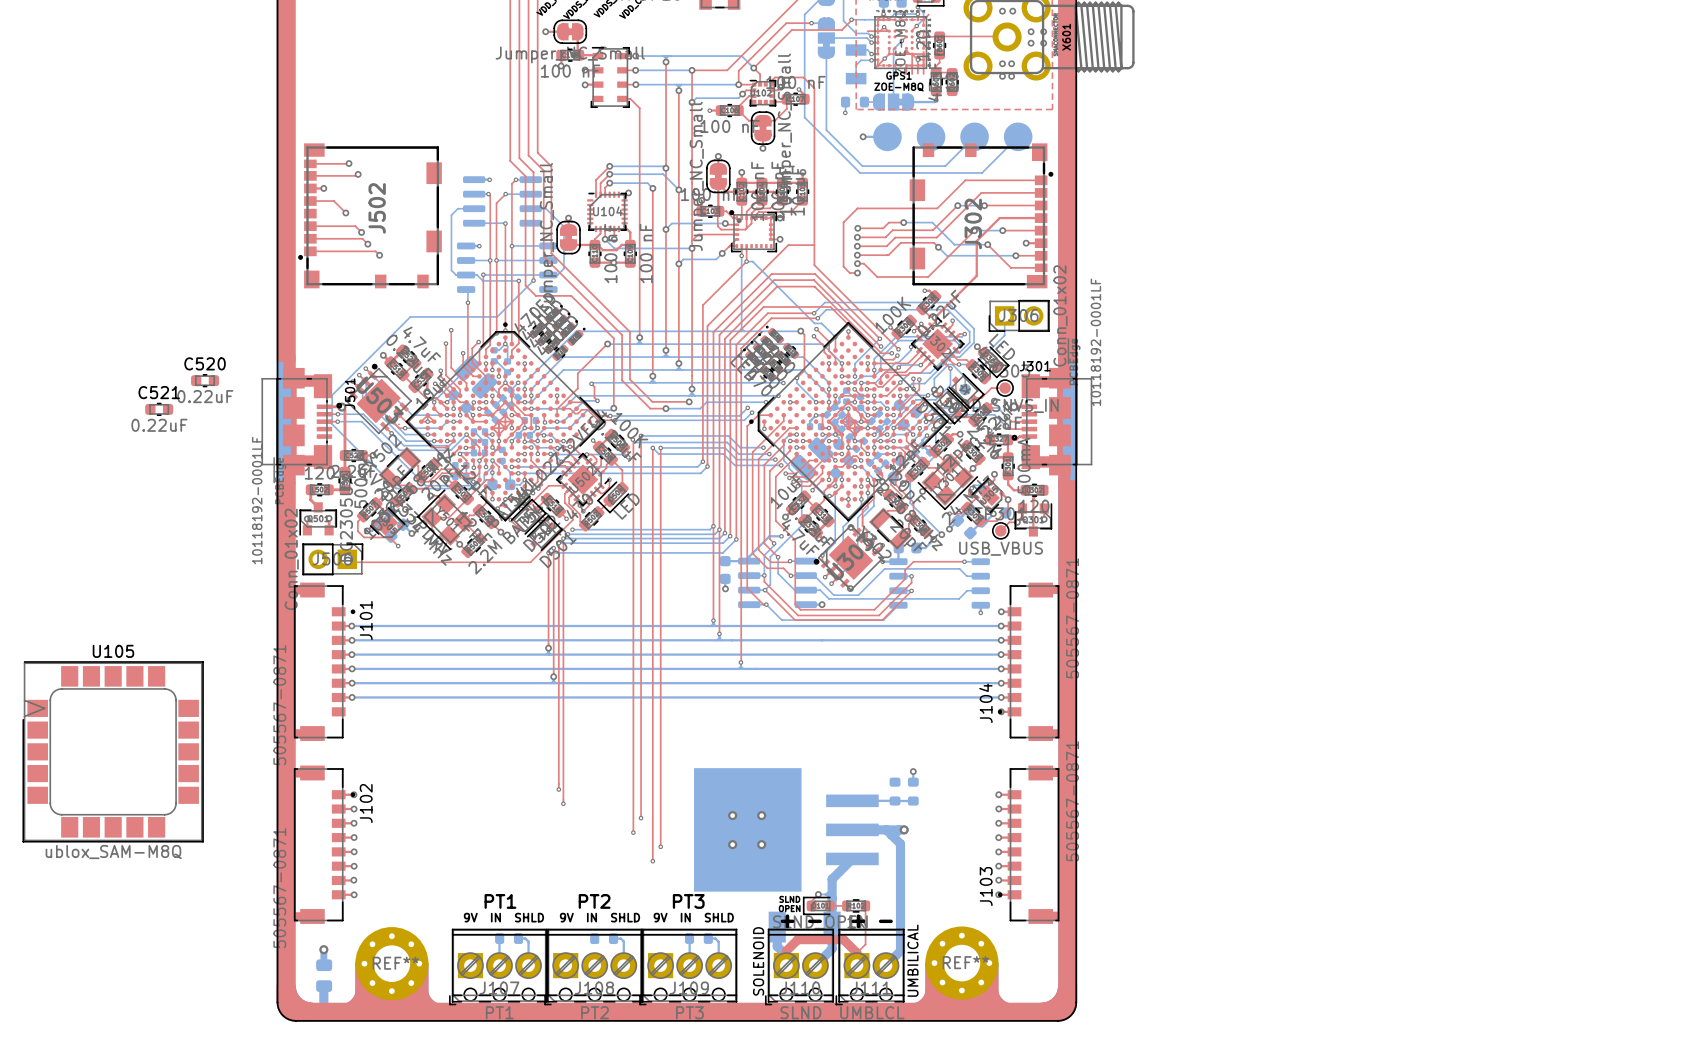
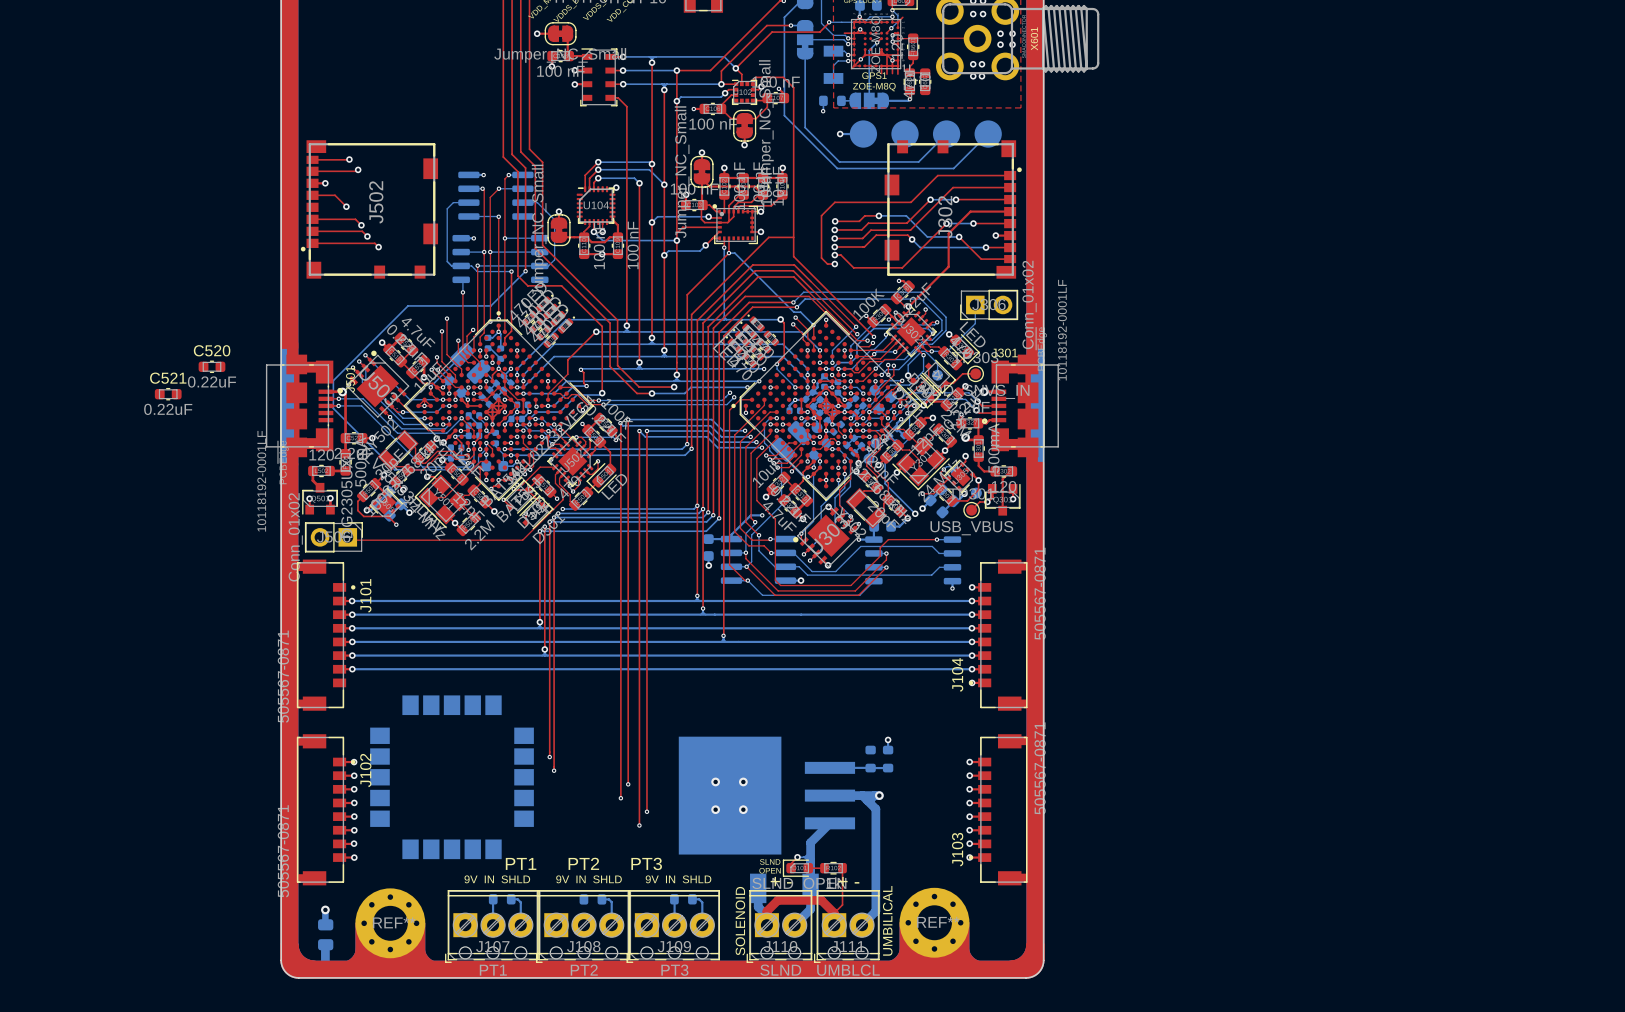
U105: ublox_SAM-M8Q (113, 751) -> none
part: none -> (452, 777)

